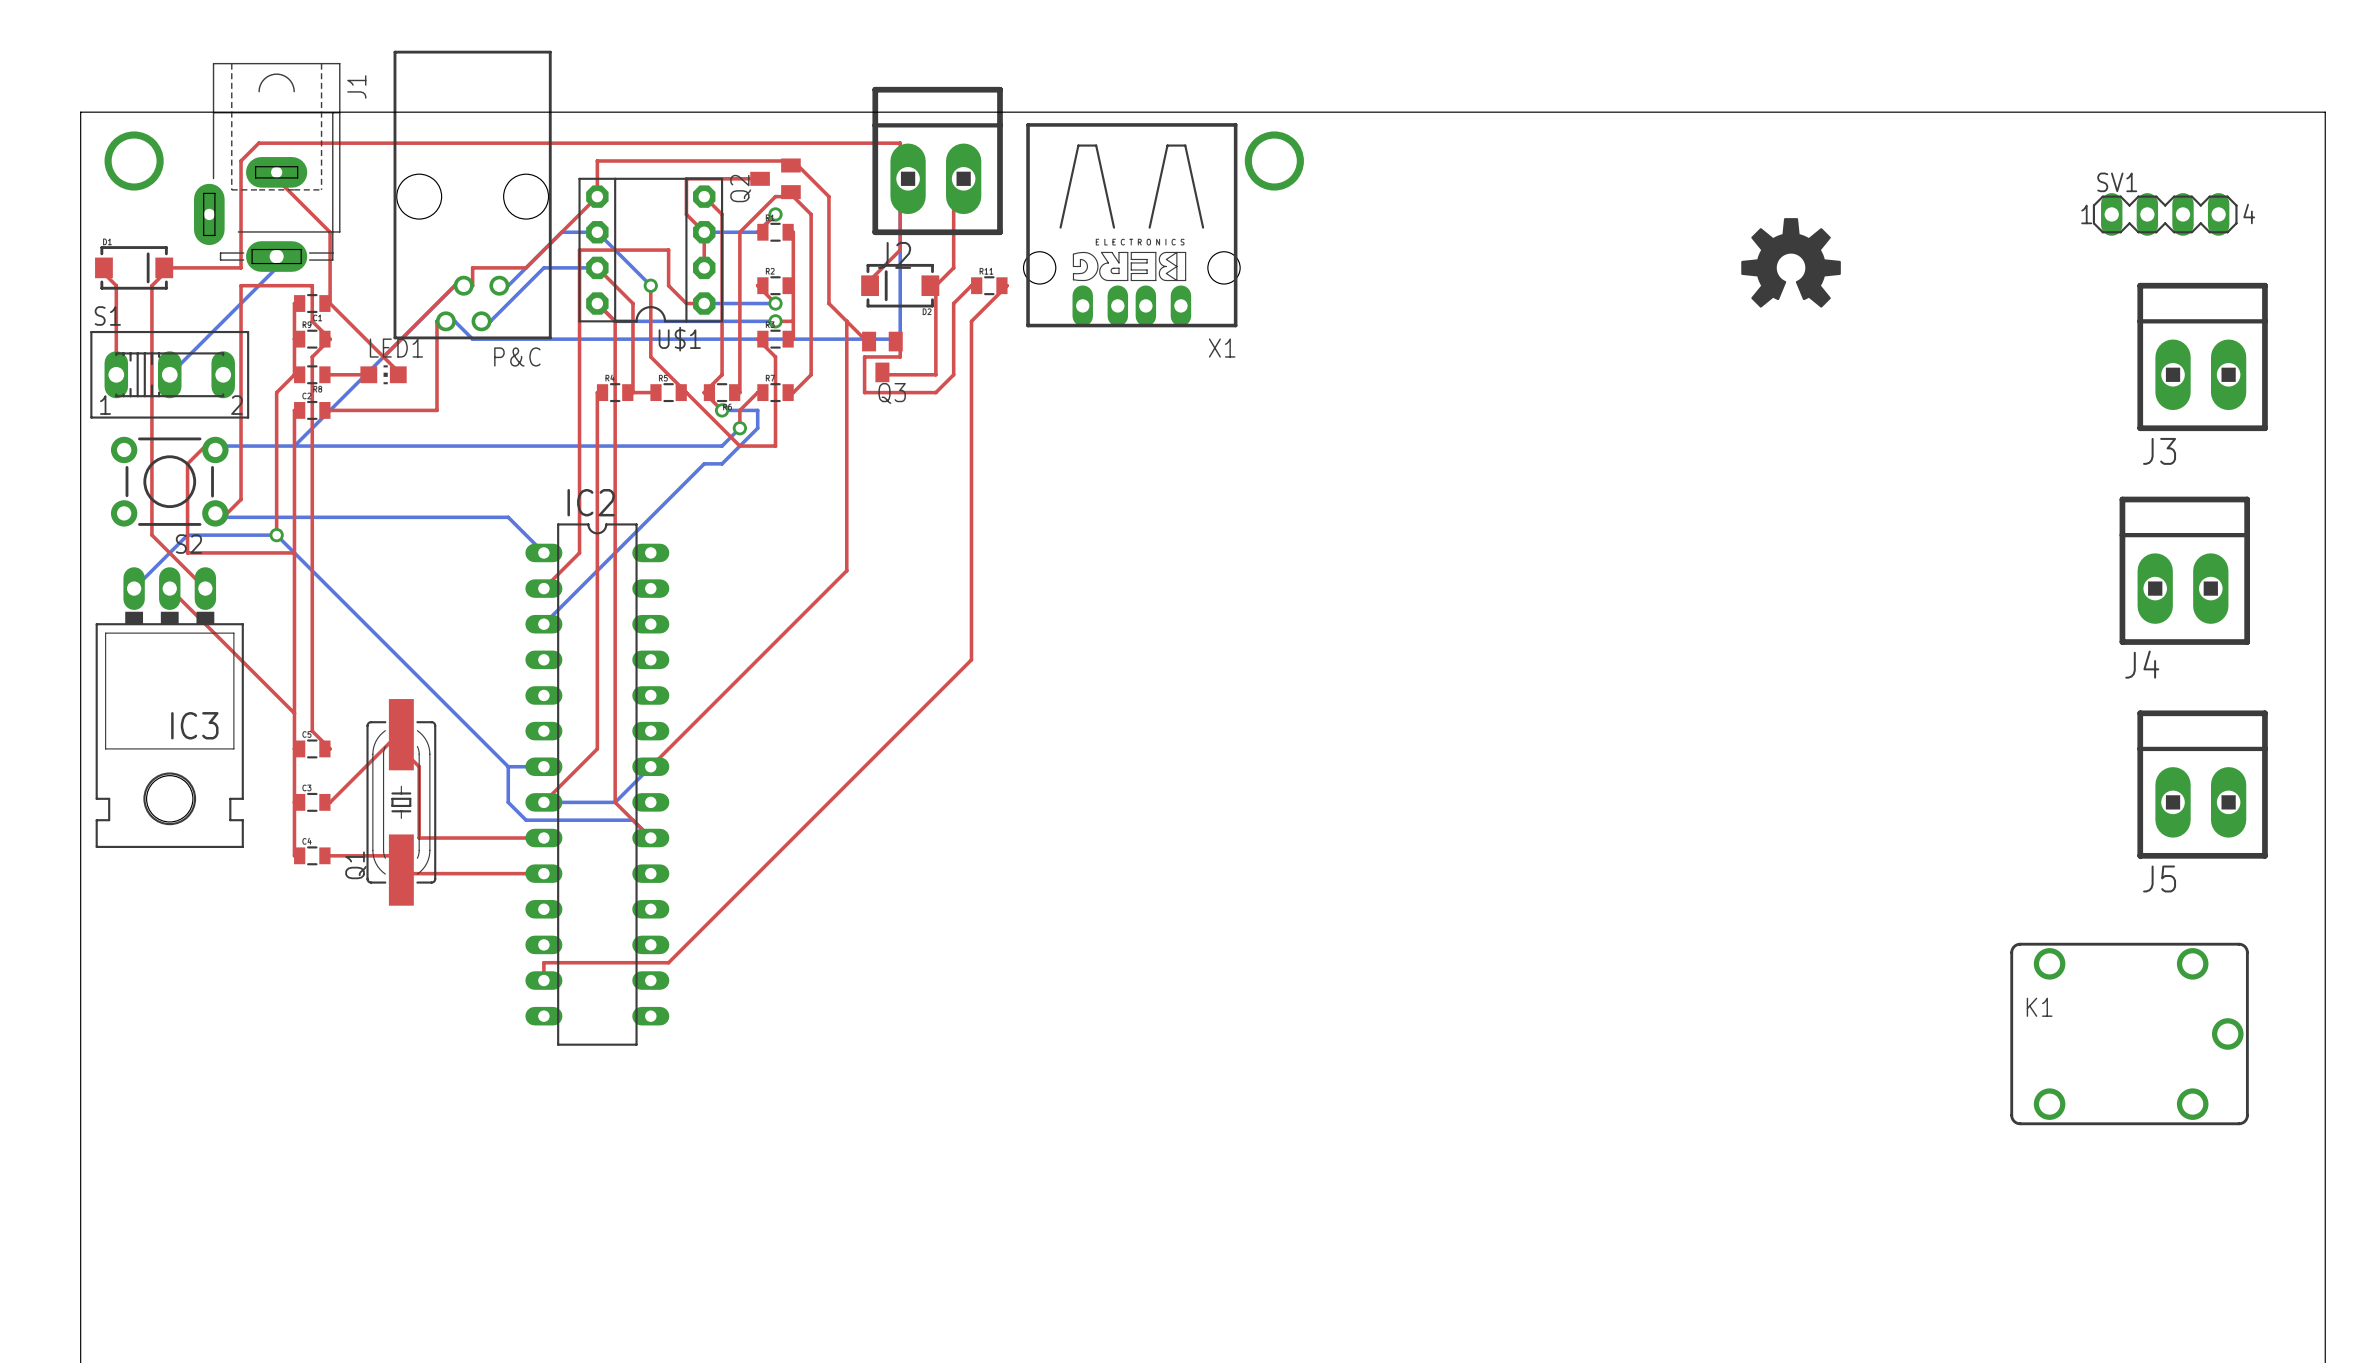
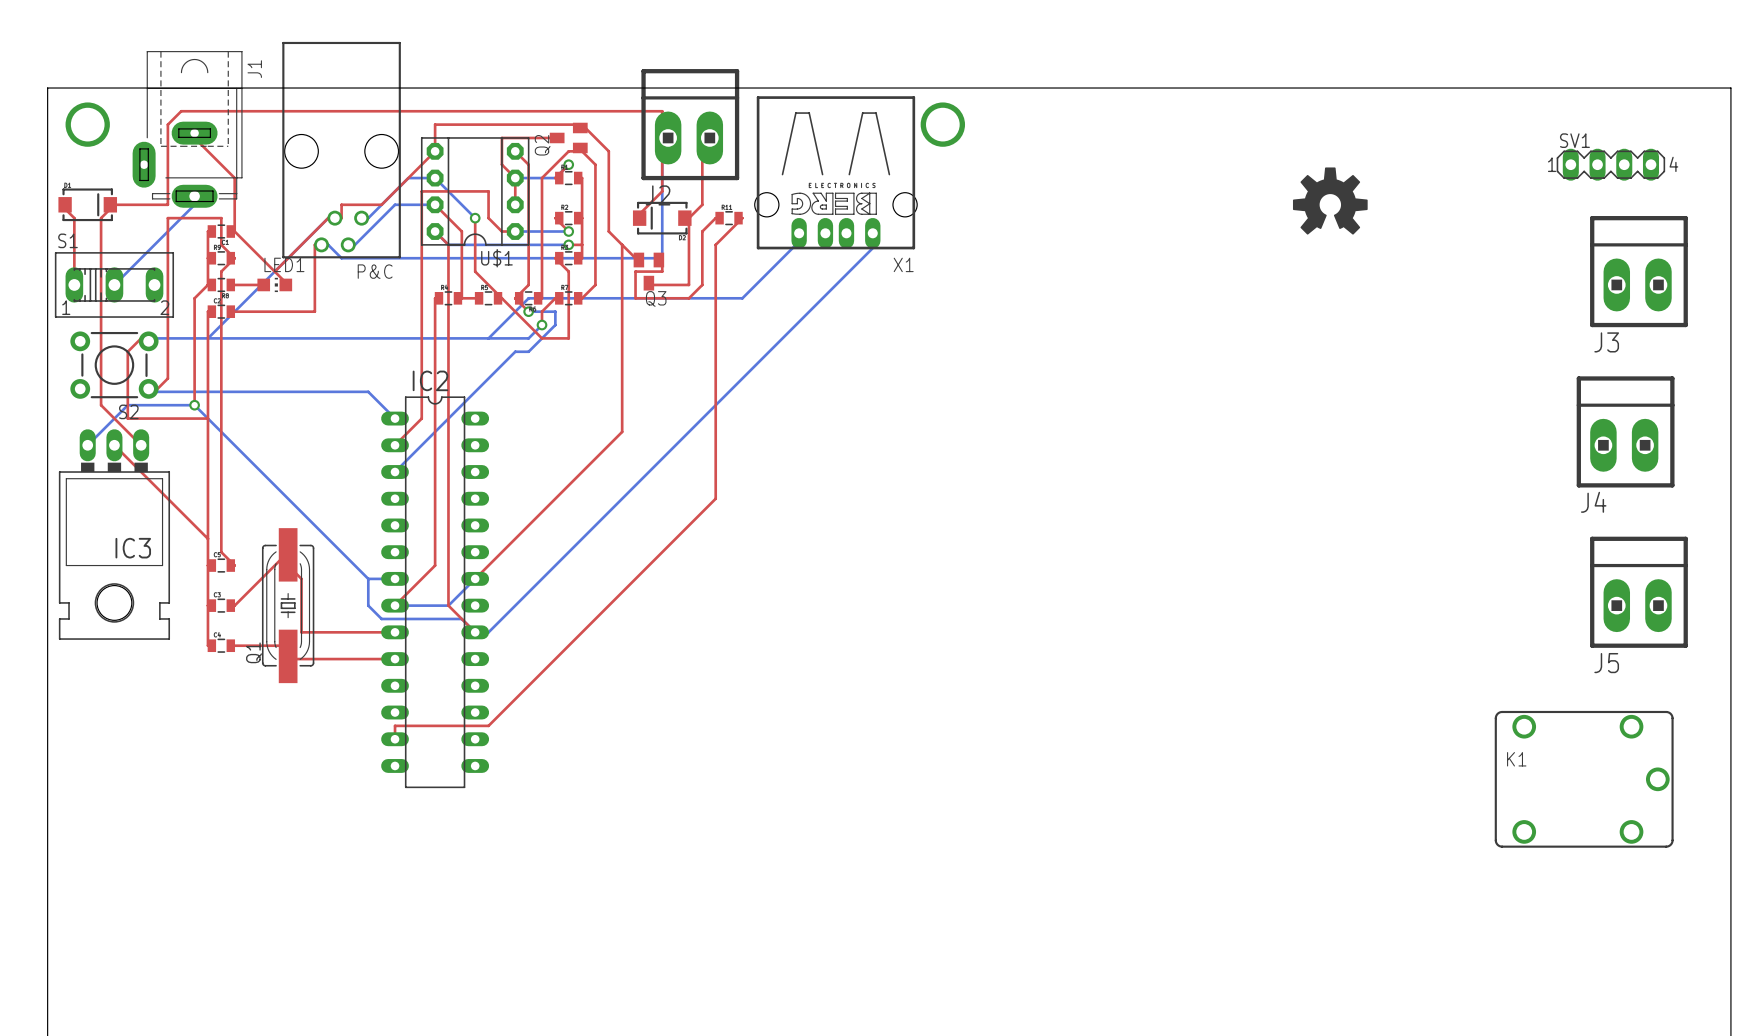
bottom track: none -> (799, 233) (795, 244) (742, 298) (528, 298) (488, 338)
bottom track: none -> (872, 233) (876, 244) (488, 632) (475, 632)

